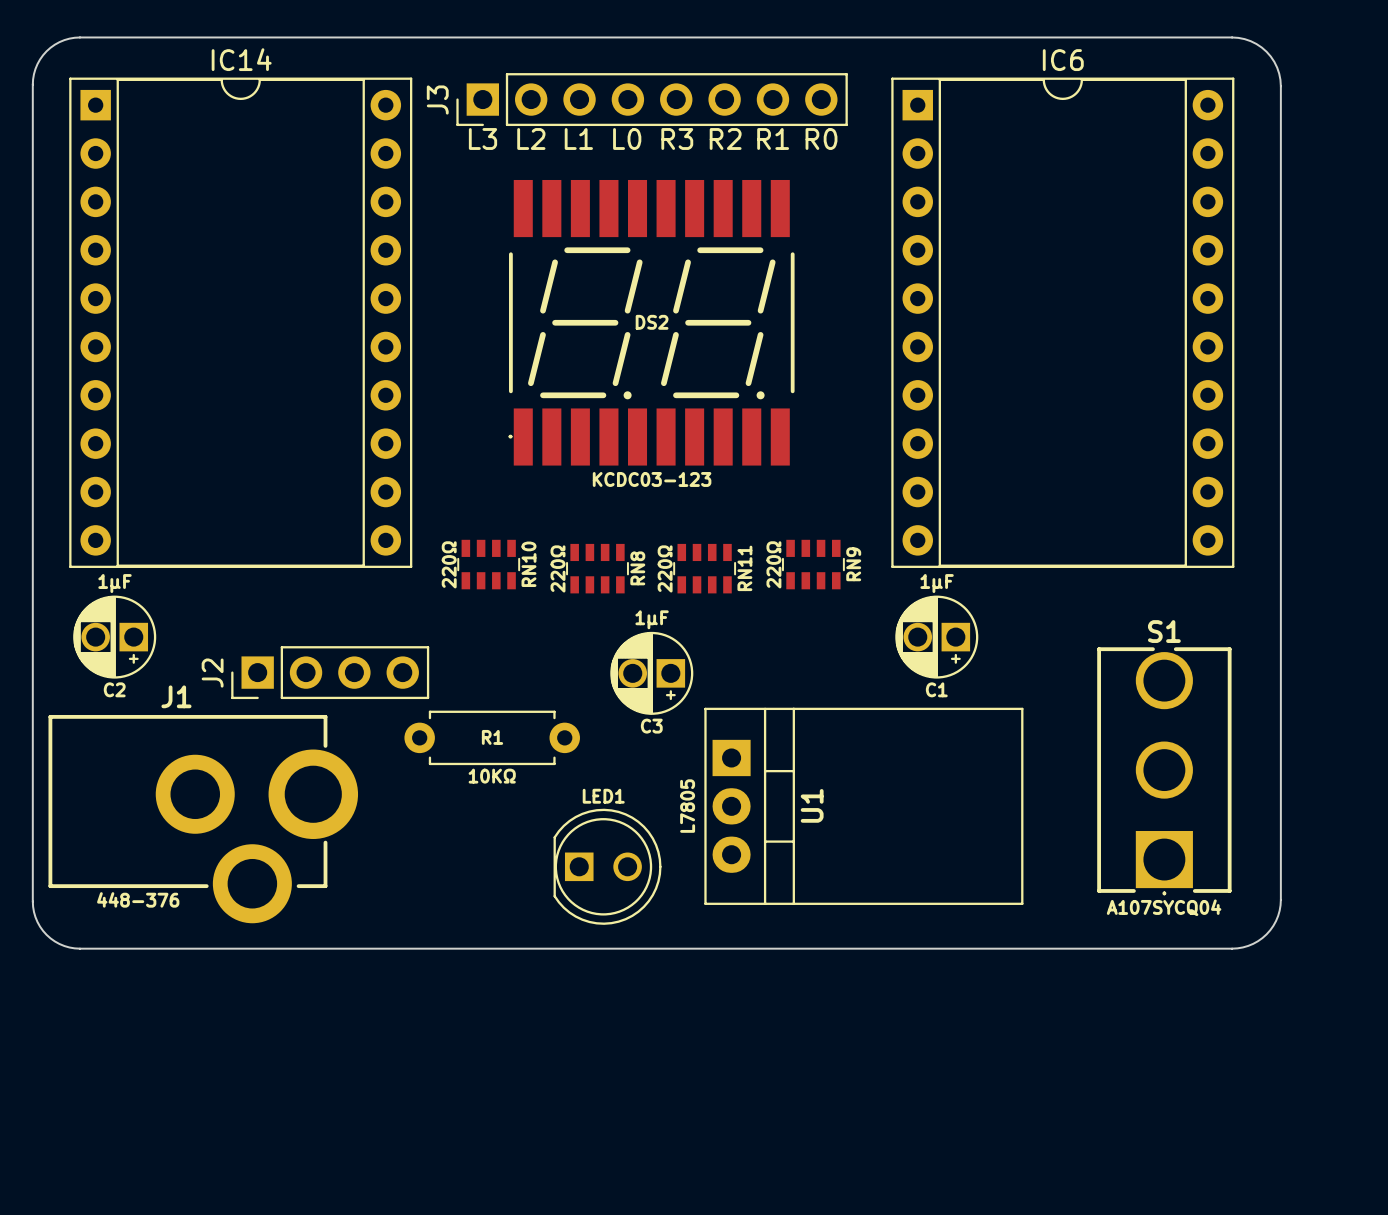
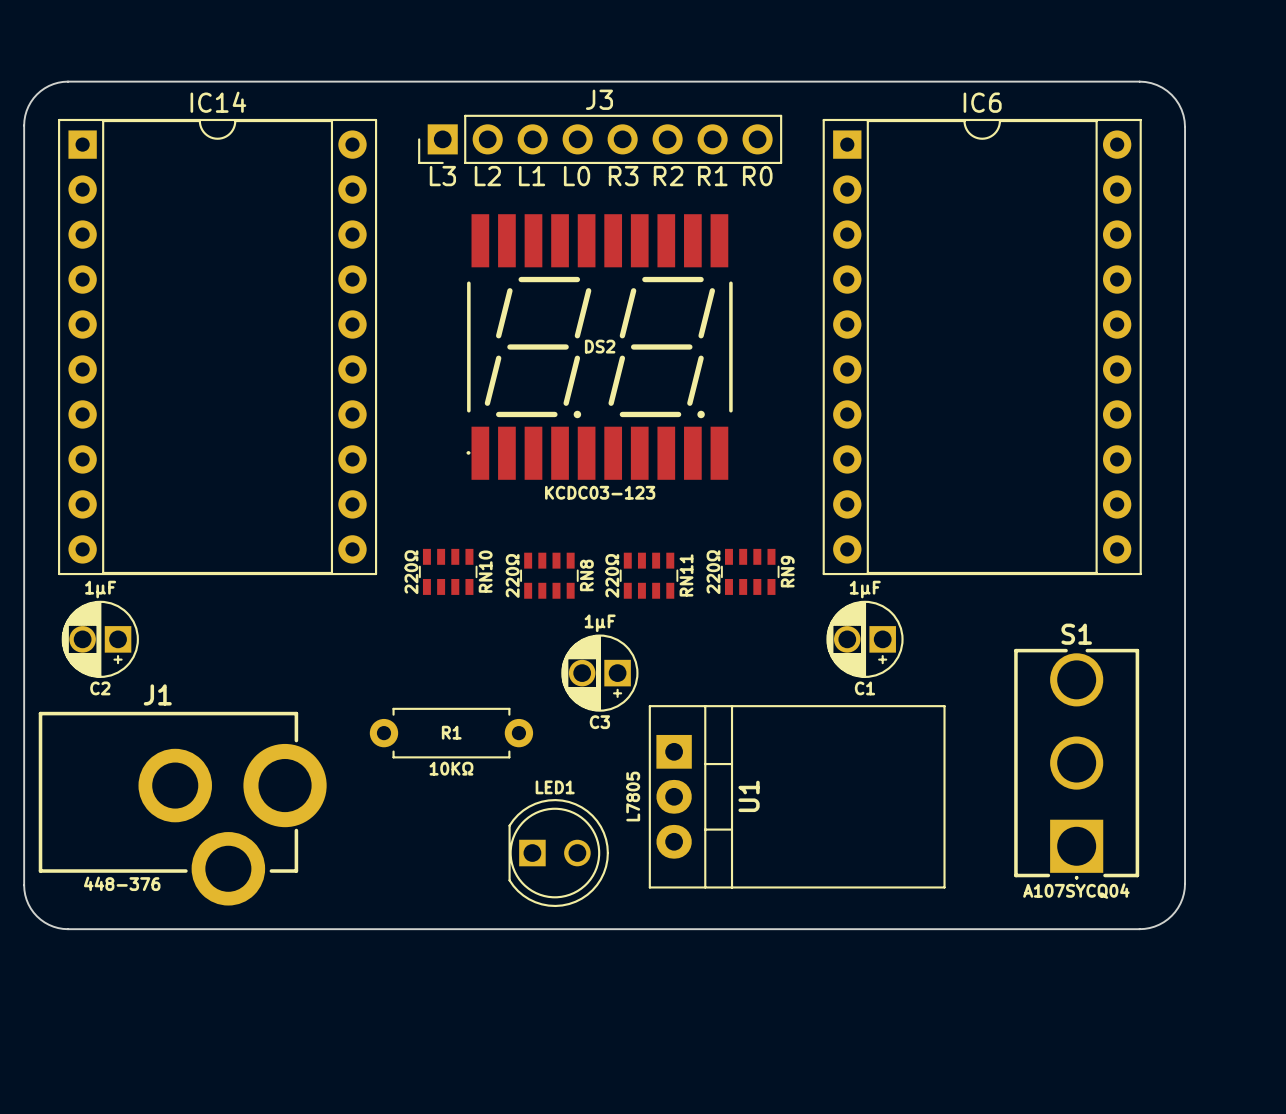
J3 name rotation: 0° (437, 100) -> 90° clockwise (599, 99)
J3 name position: J3 (437, 100) -> J3 (599, 99)
J2: (330, 672) -> none

